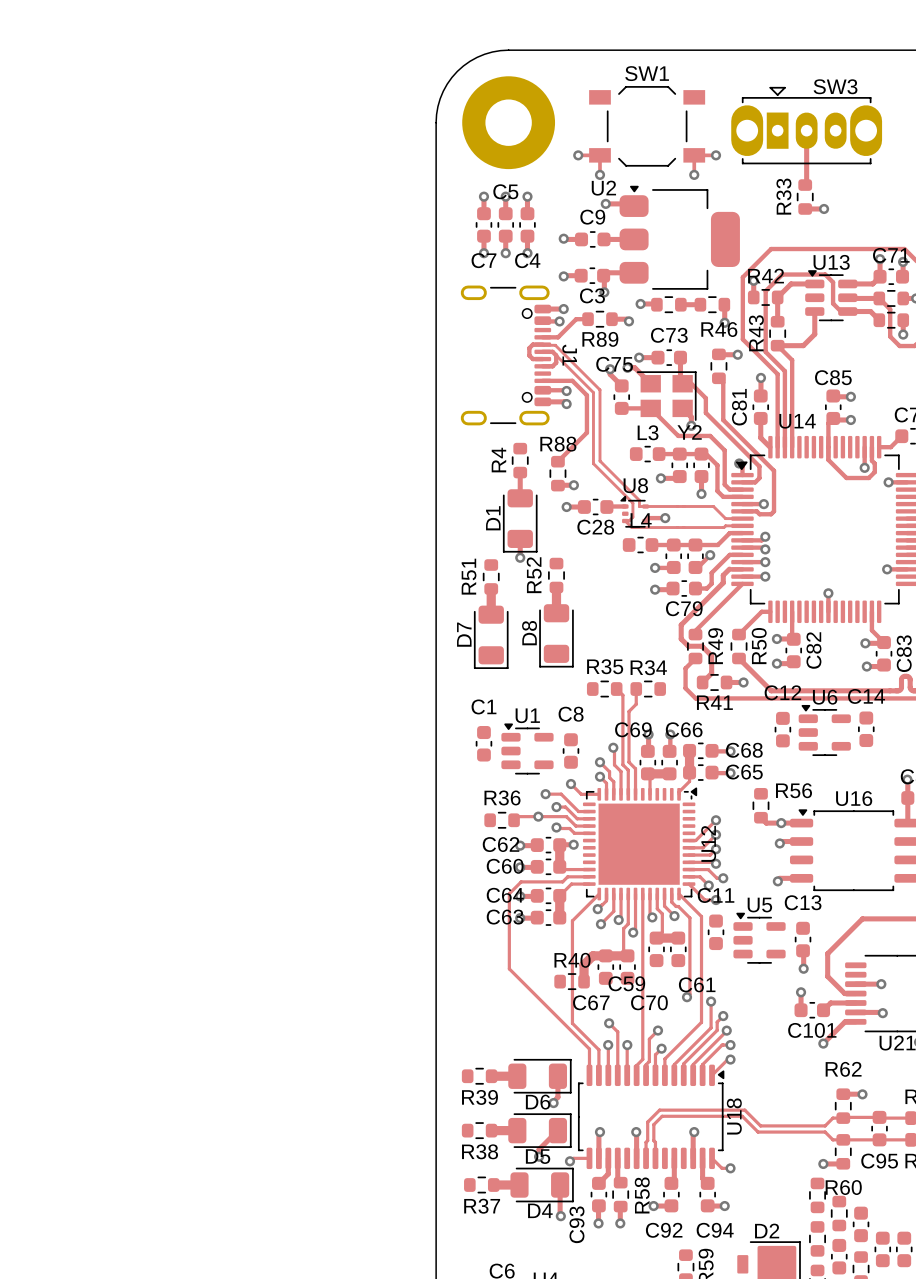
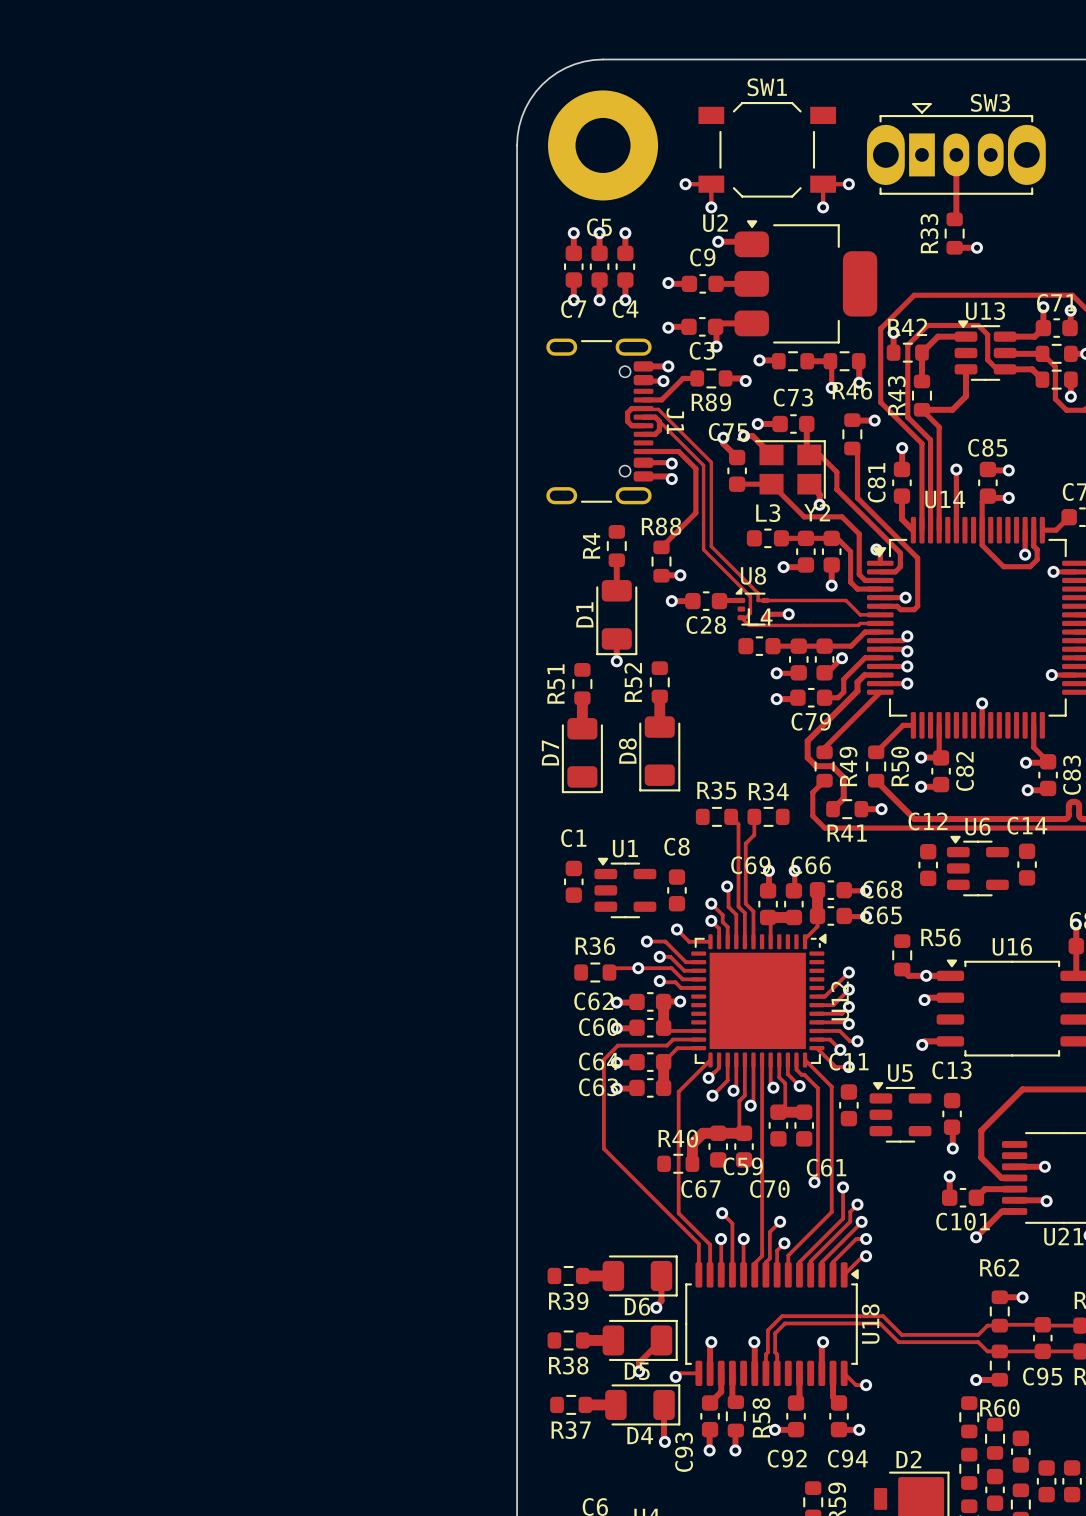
track: none -> (830, 361) (831, 387)
via: none -> (831, 387)
track: none -> (956, 469) (956, 530)
via: none -> (956, 469)

